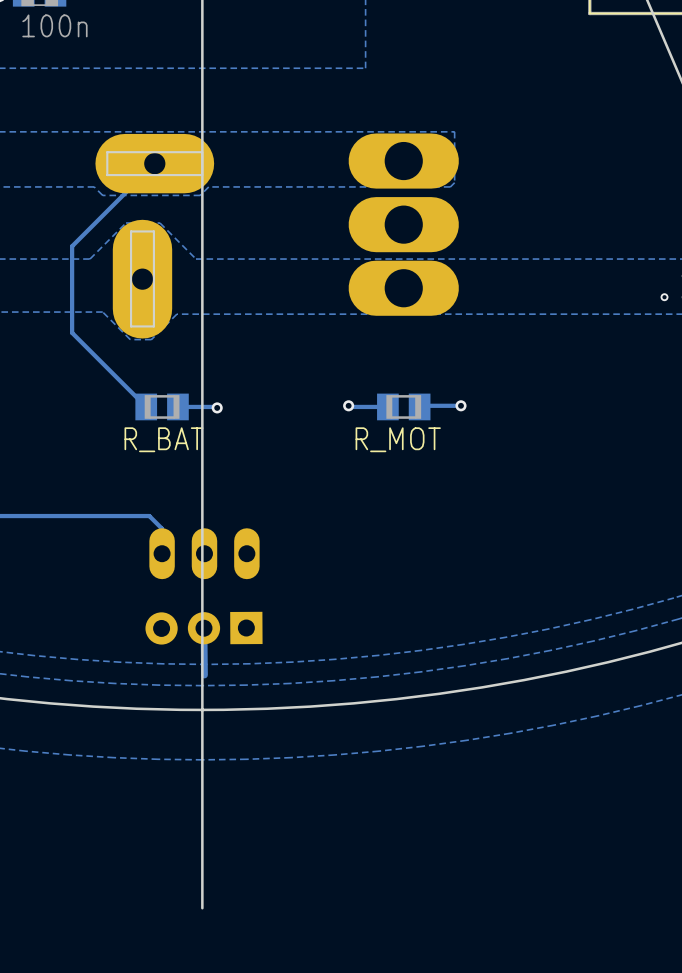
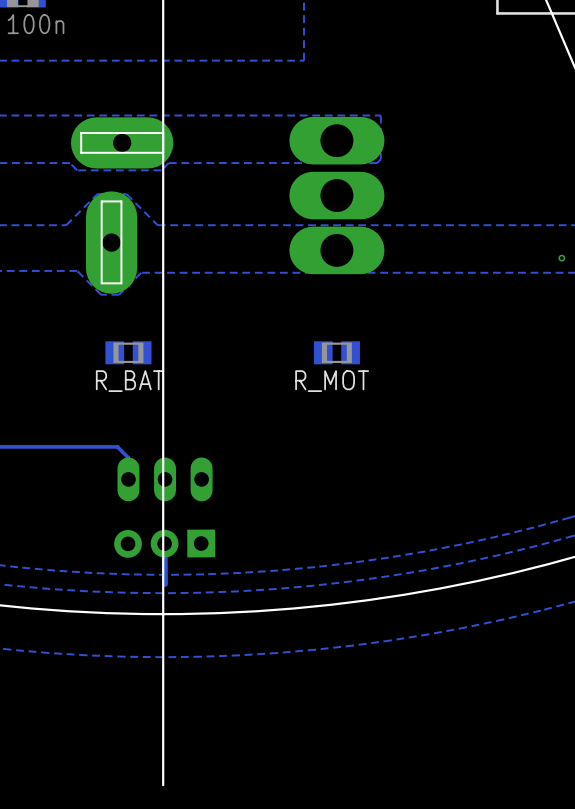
track: (154, 163) (72, 246) (72, 332) (146, 406) -> none
track: (348, 405) (387, 406) -> none
via: (348, 405) -> none
track: (460, 405) (419, 406) -> none
via: (460, 405) -> none
track: (177, 406) (217, 407) -> none
via: (217, 407) -> none

